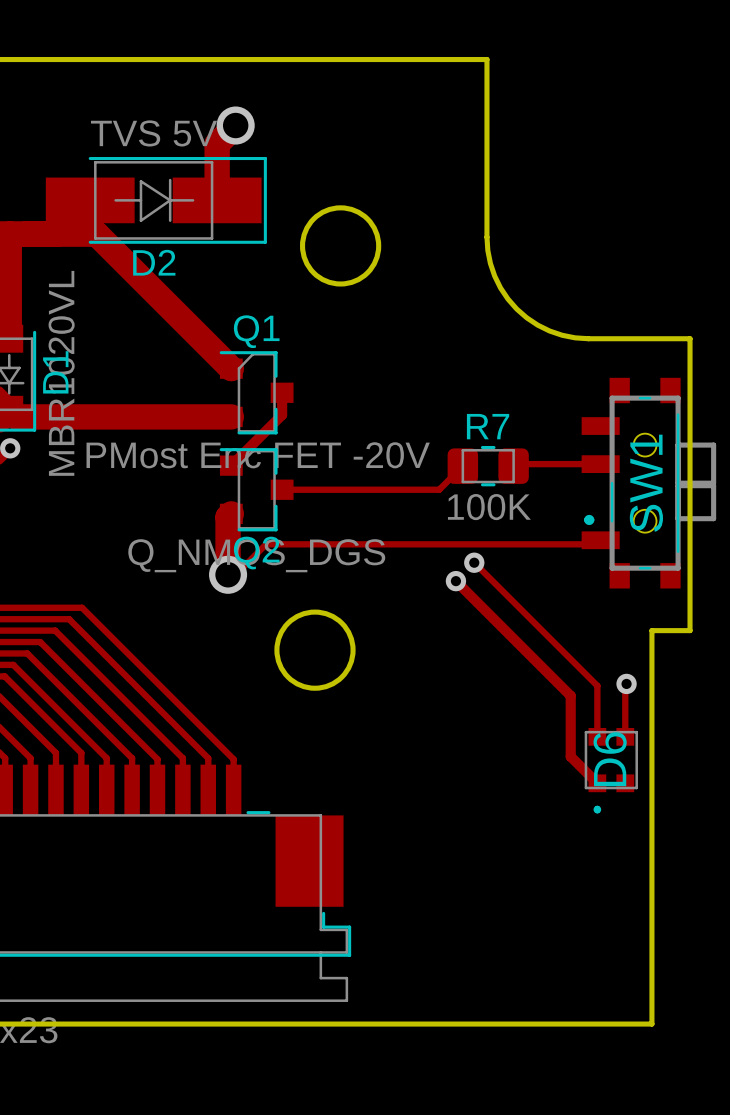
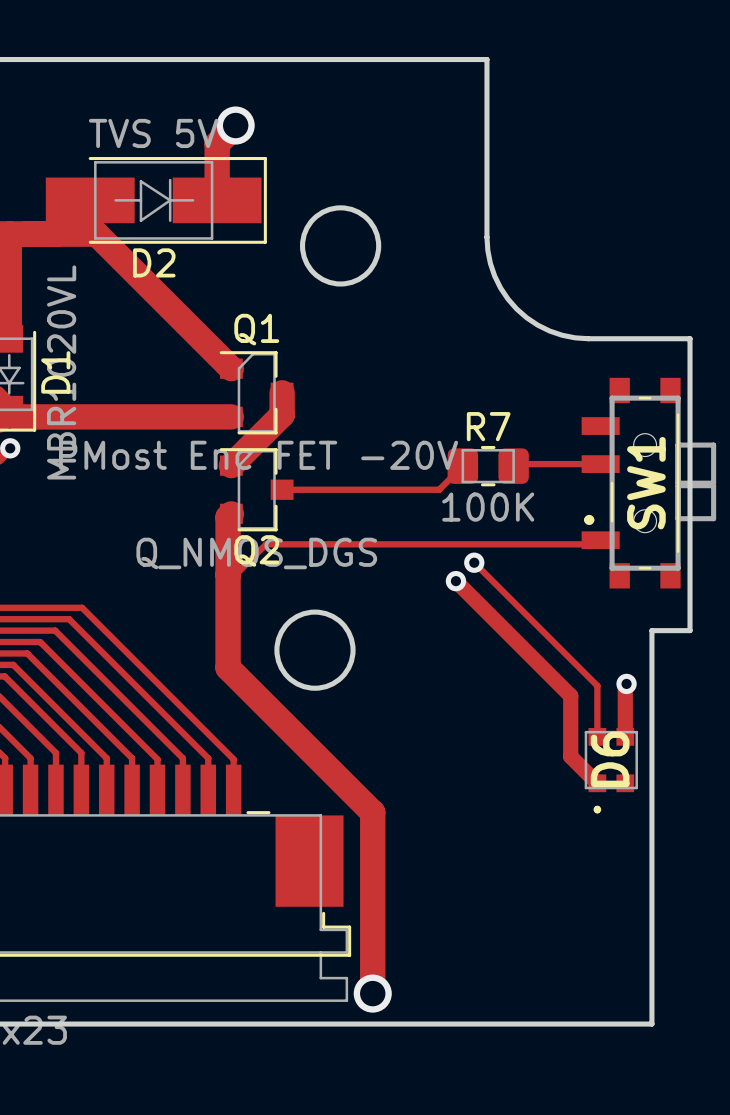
track width: thin (282, 392) (282, 414) (231, 465) -> thick (282, 392) (282, 414) (231, 465)
via: (228, 574) -> none
track width: thin (455, 581) (570, 695) (570, 756) (597, 783) -> thick (455, 581) (570, 695) (570, 756) (597, 783)
track: none -> (228, 582) (228, 667) (372, 812) (372, 993)
track width: thin (625, 687) (625, 736) -> thick (625, 687) (625, 736)
via: none -> (372, 993)

